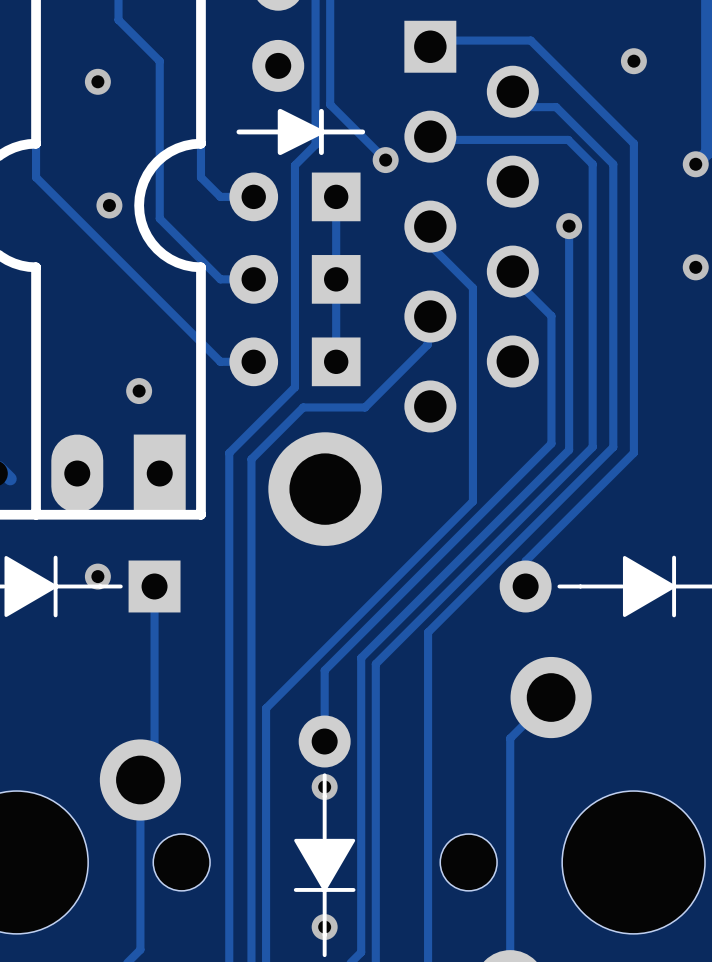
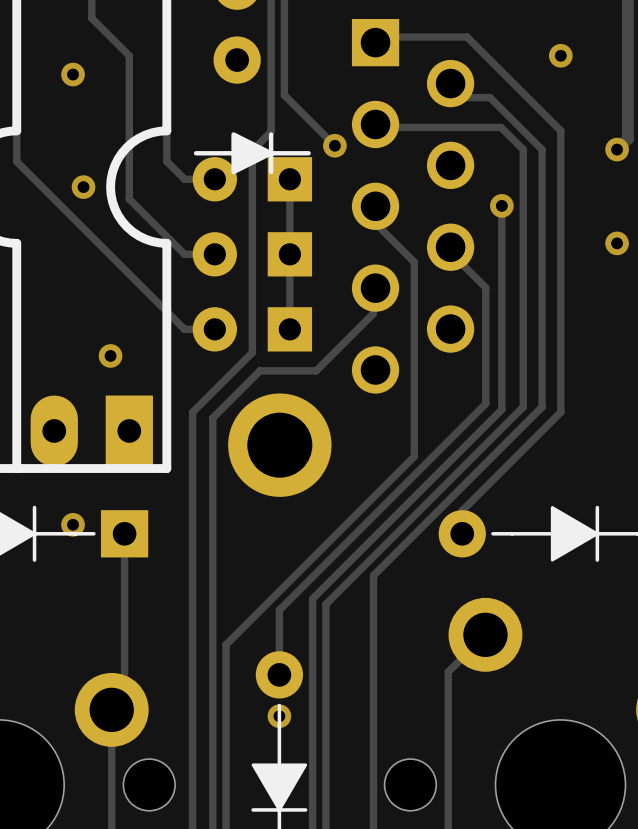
line: (321, 111) (321, 152) -> (271, 134) (271, 172)
drawing position: (300, 131) -> (252, 153)
line: (362, 131) (238, 131) -> (308, 153) (196, 153)

